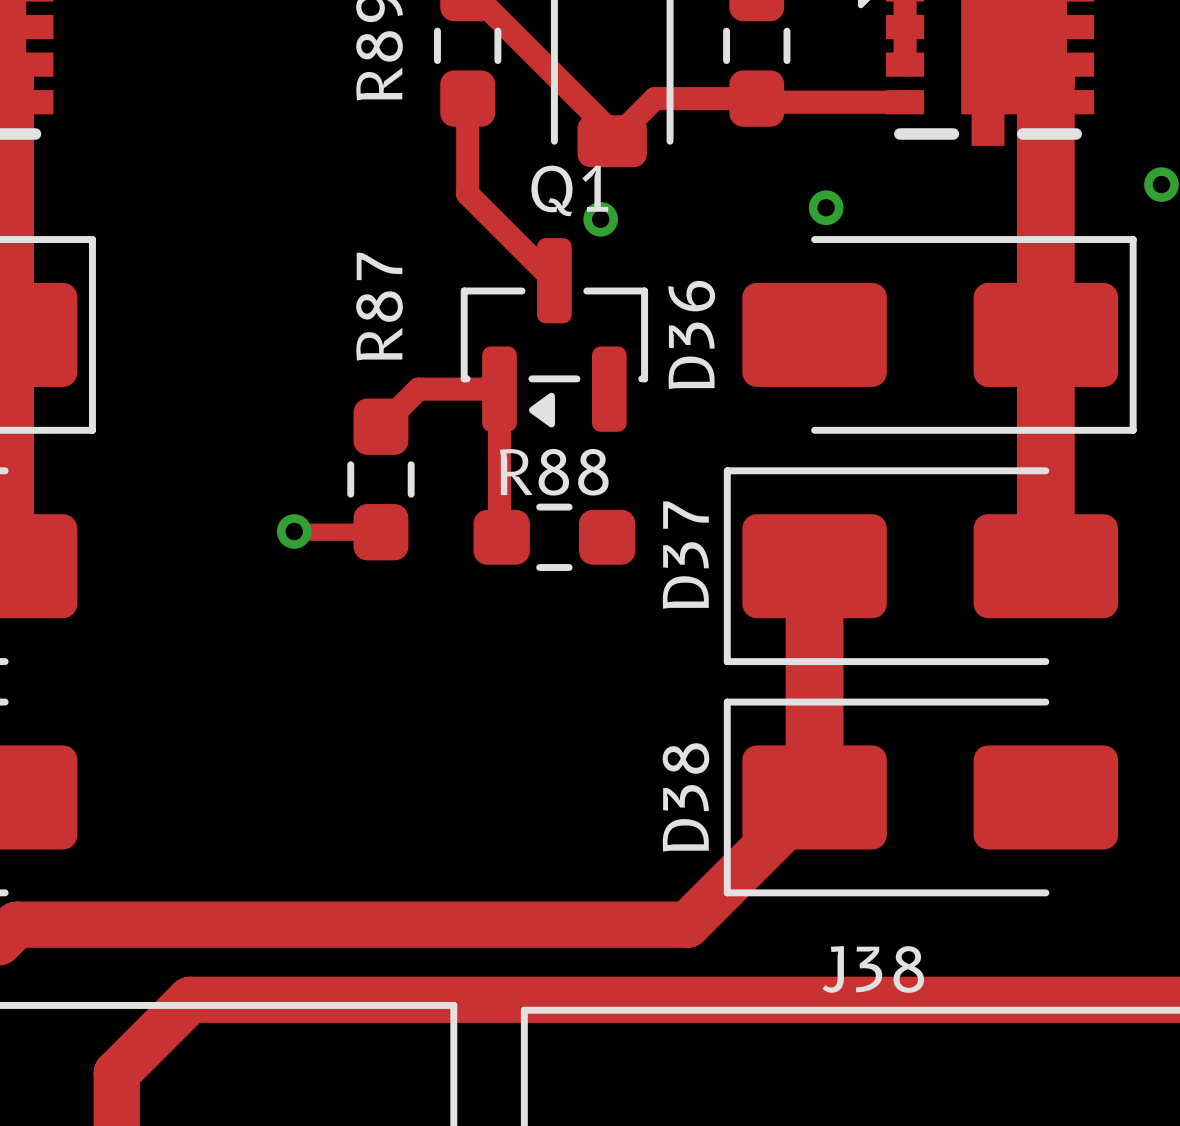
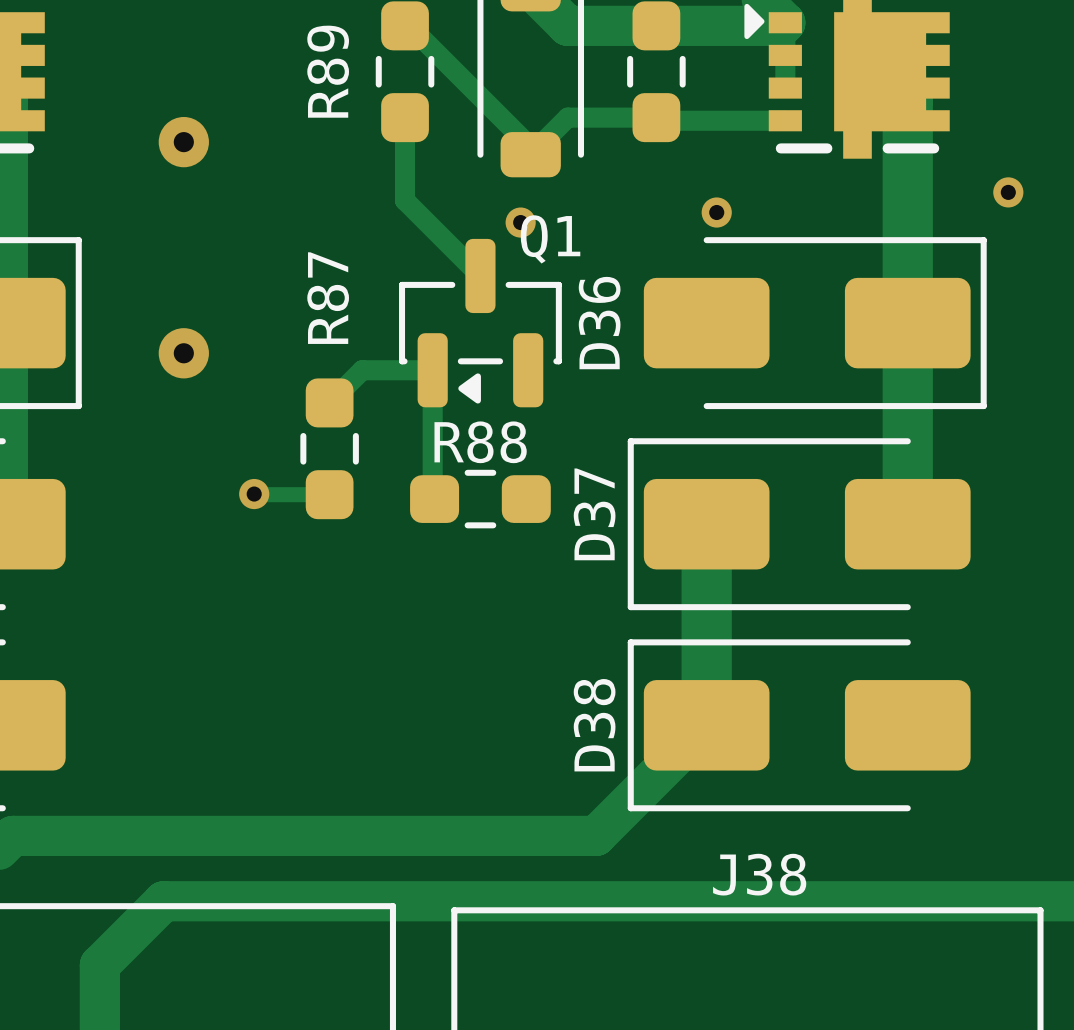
via: none -> (183, 142)
Q1 name position: Q1 (569, 190) -> Q1 (550, 239)
via: none -> (183, 353)

